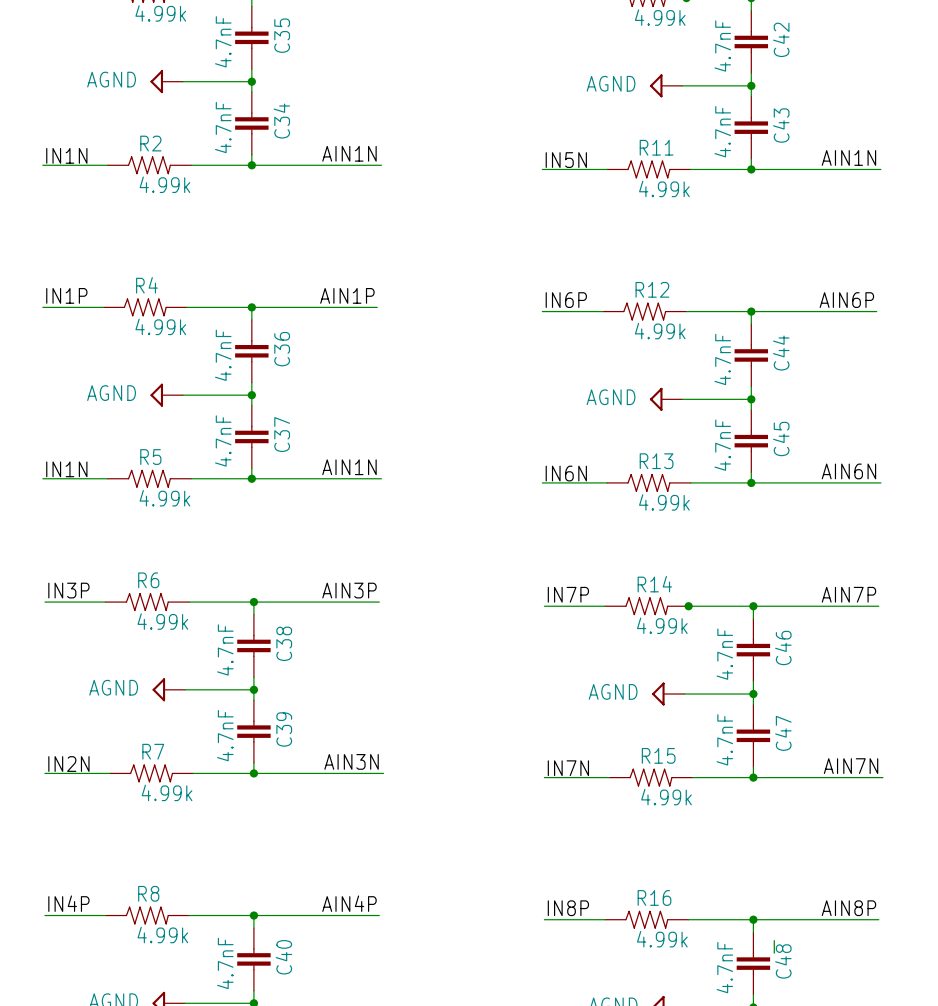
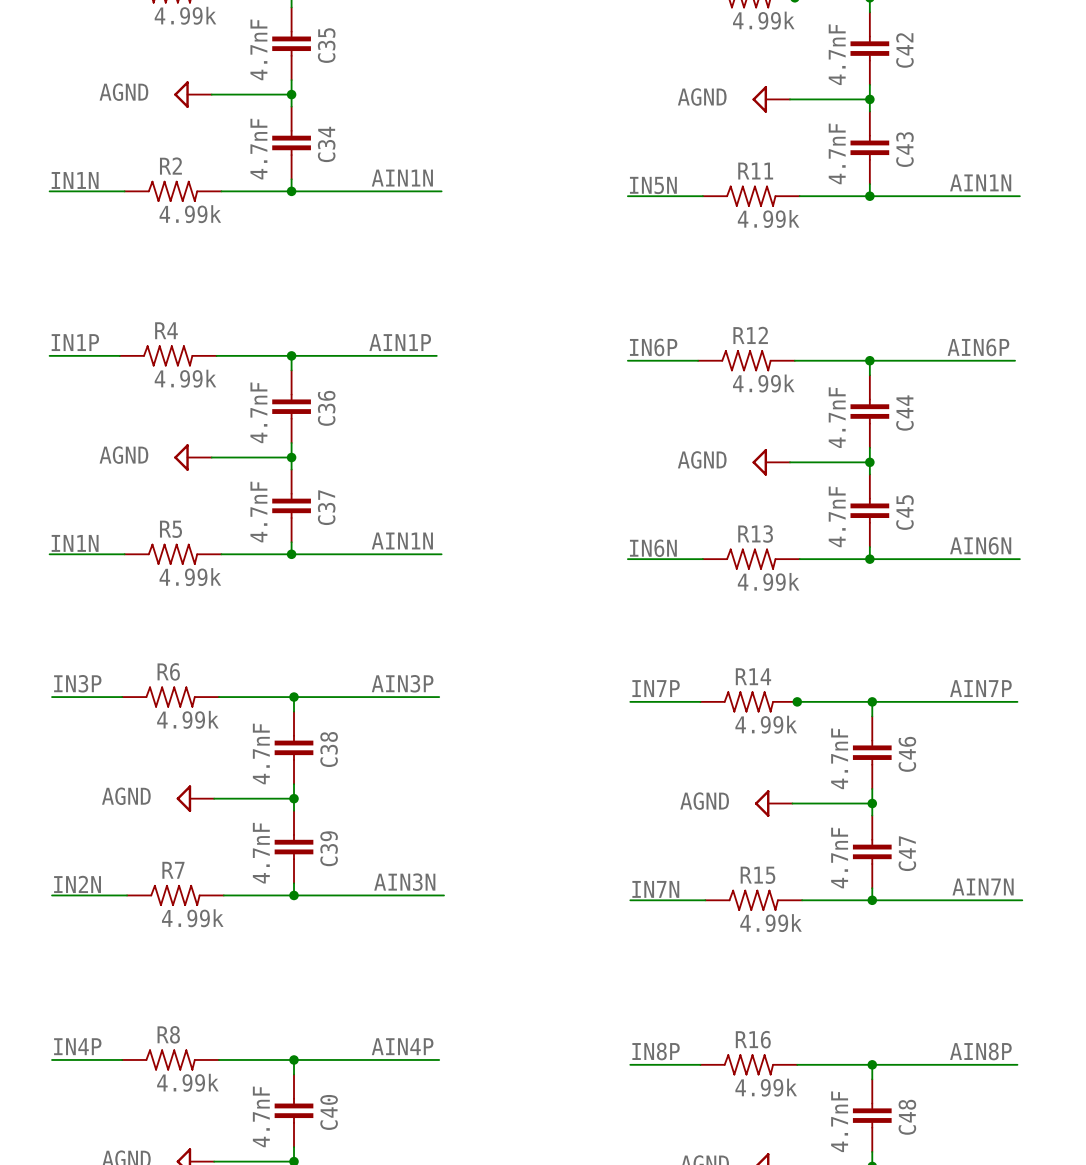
wire: (774, 940) (774, 953) -> none

